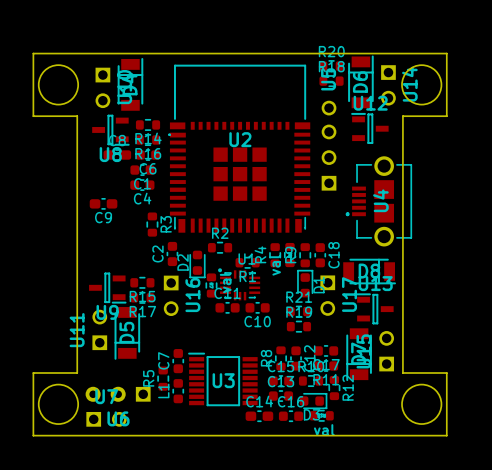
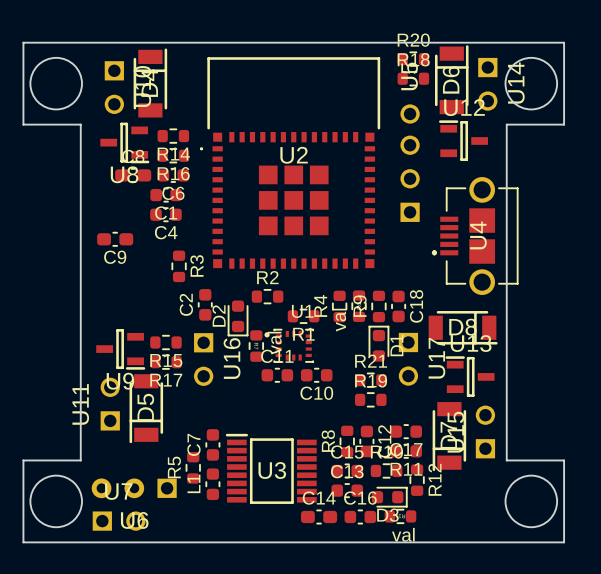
U2 footprint: [168, 64, 311, 233] -> [200, 57, 381, 269]
U1 footprint: [218, 268, 261, 301] -> [264, 328, 314, 363]

